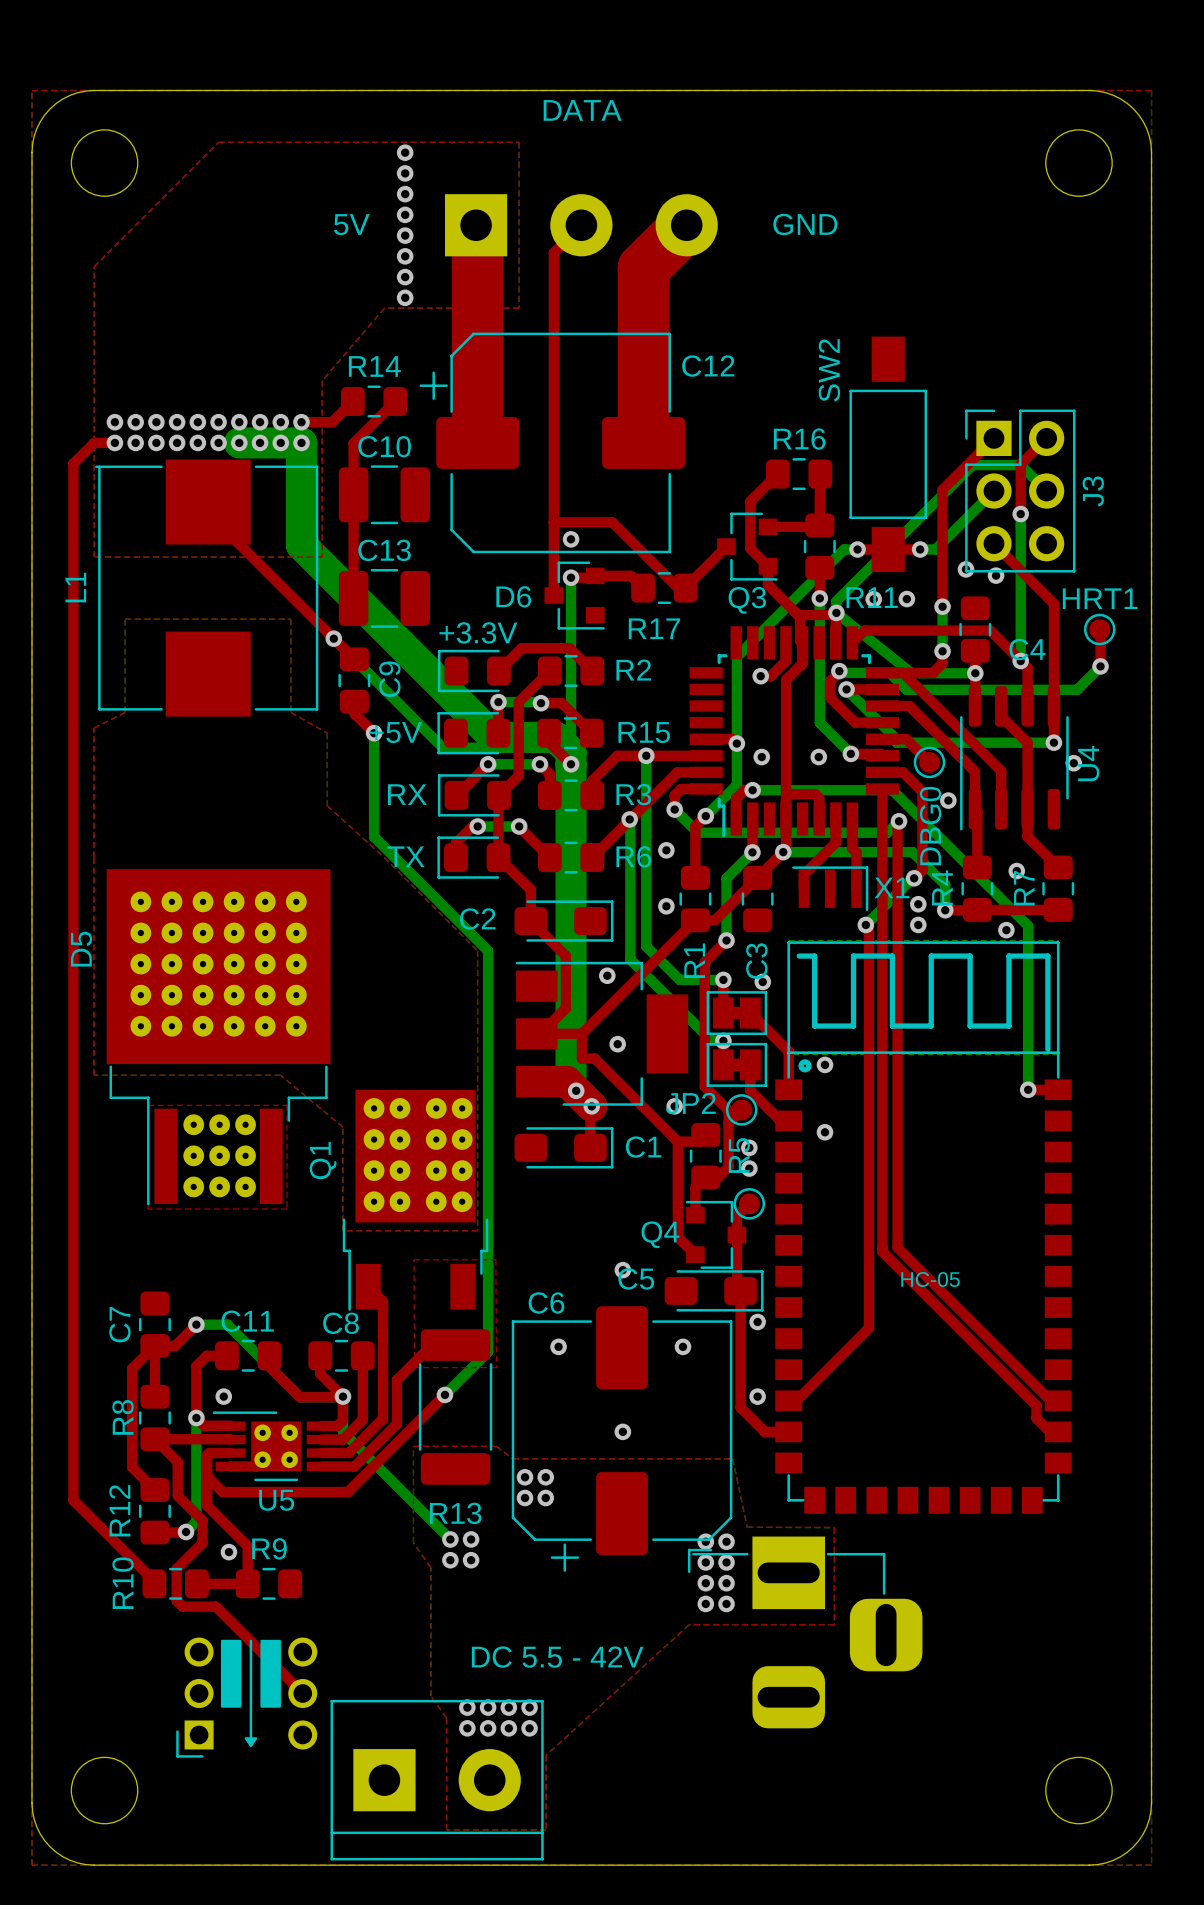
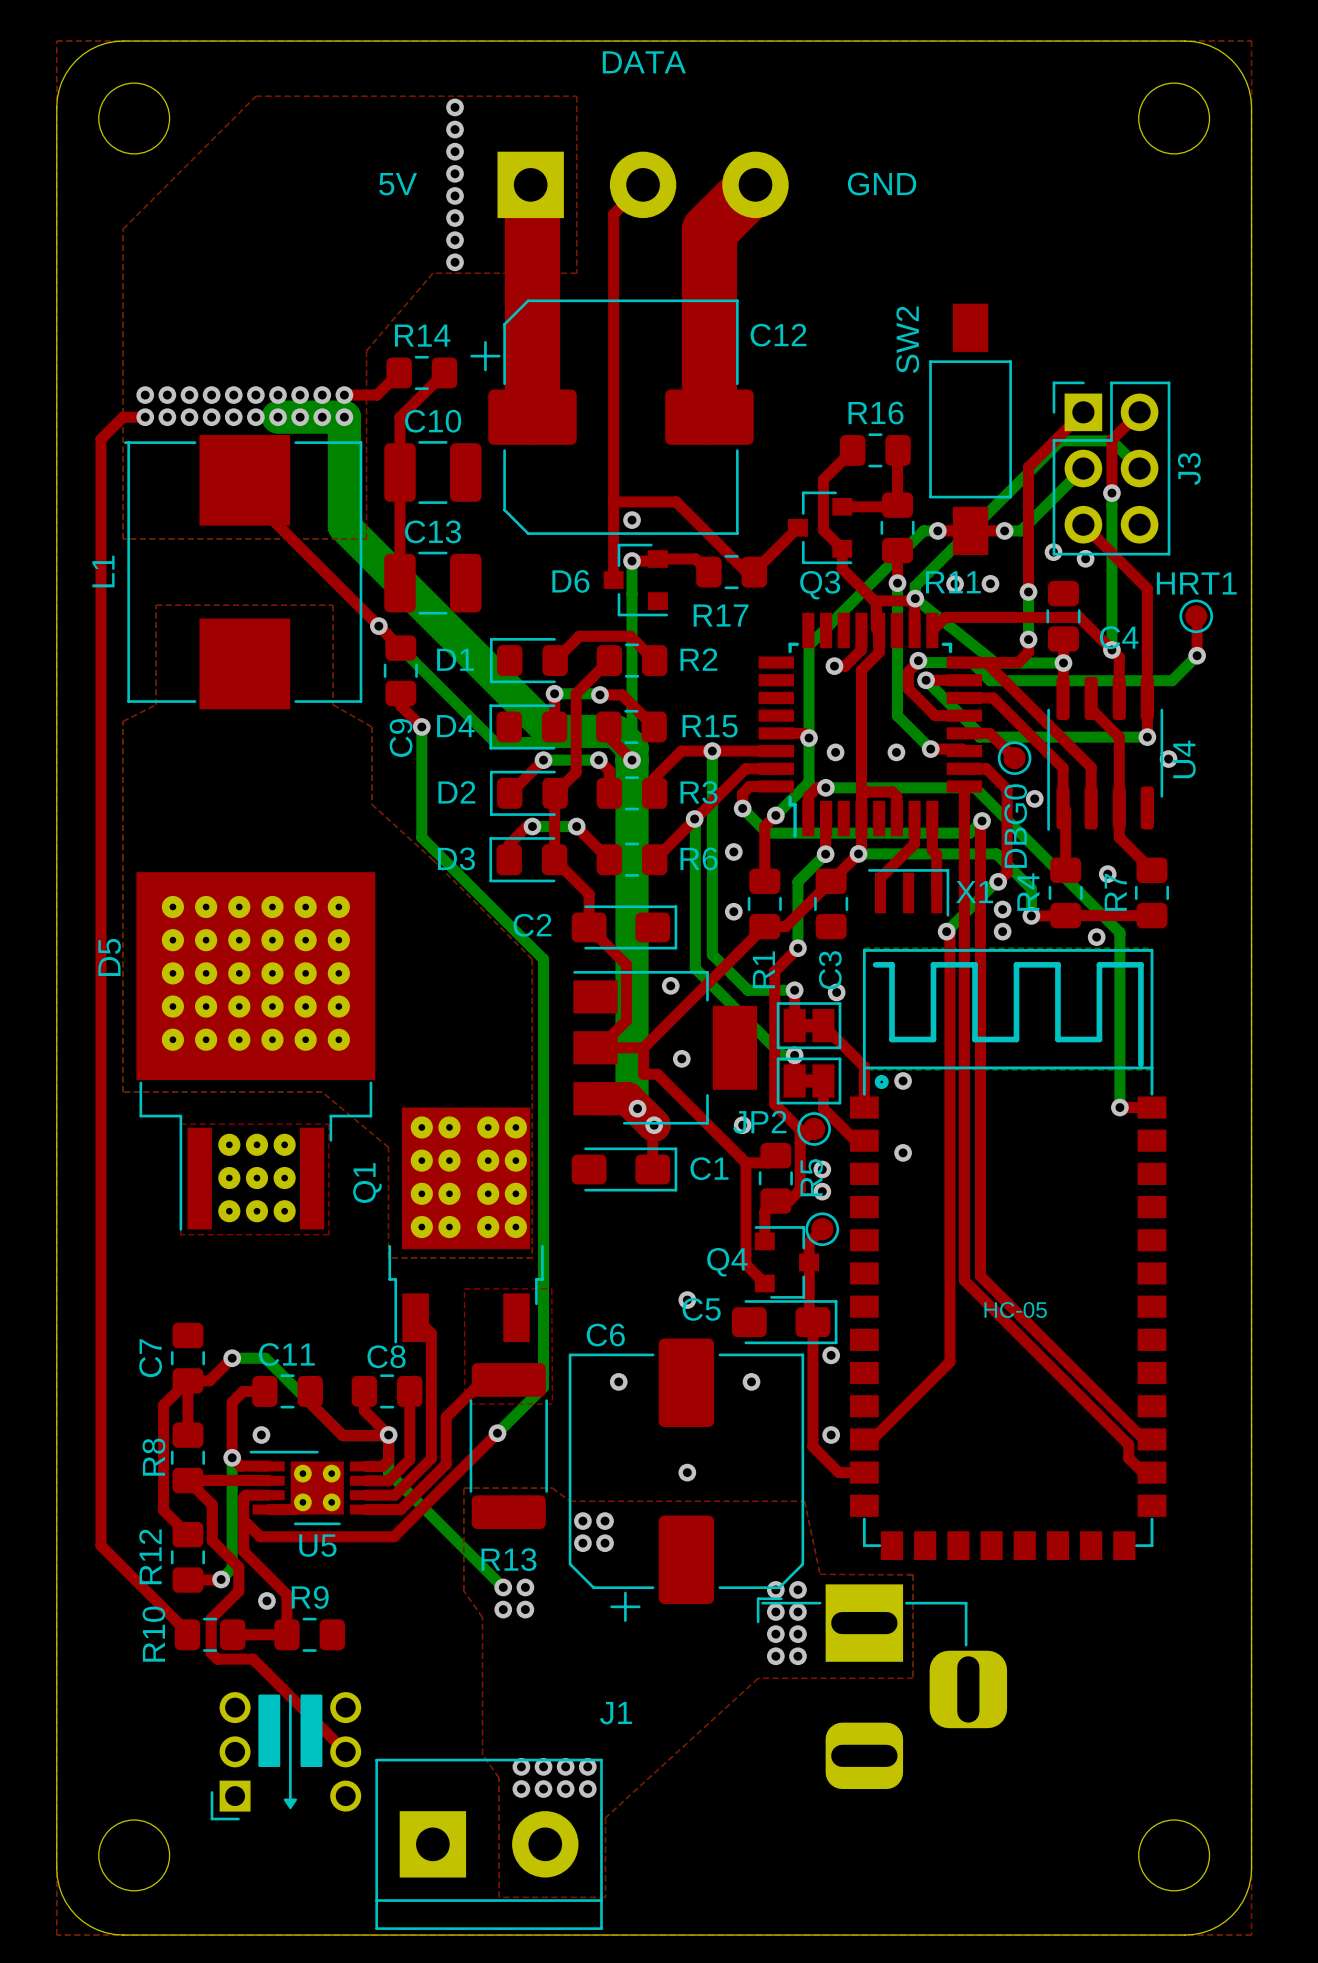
+3.3V name: +3.3V (478, 632) -> D1 (455, 659)
C9 name position: C9 (389, 679) -> C9 (401, 737)
+5V name: +5V (395, 732) -> D4 (455, 726)
RX name: RX (407, 794) -> D2 (456, 792)
TX name: TX (405, 856) -> D3 (456, 858)
DC 5.5 - 42V name: DC 5.5 - 42V (557, 1657) -> J1 (616, 1713)

